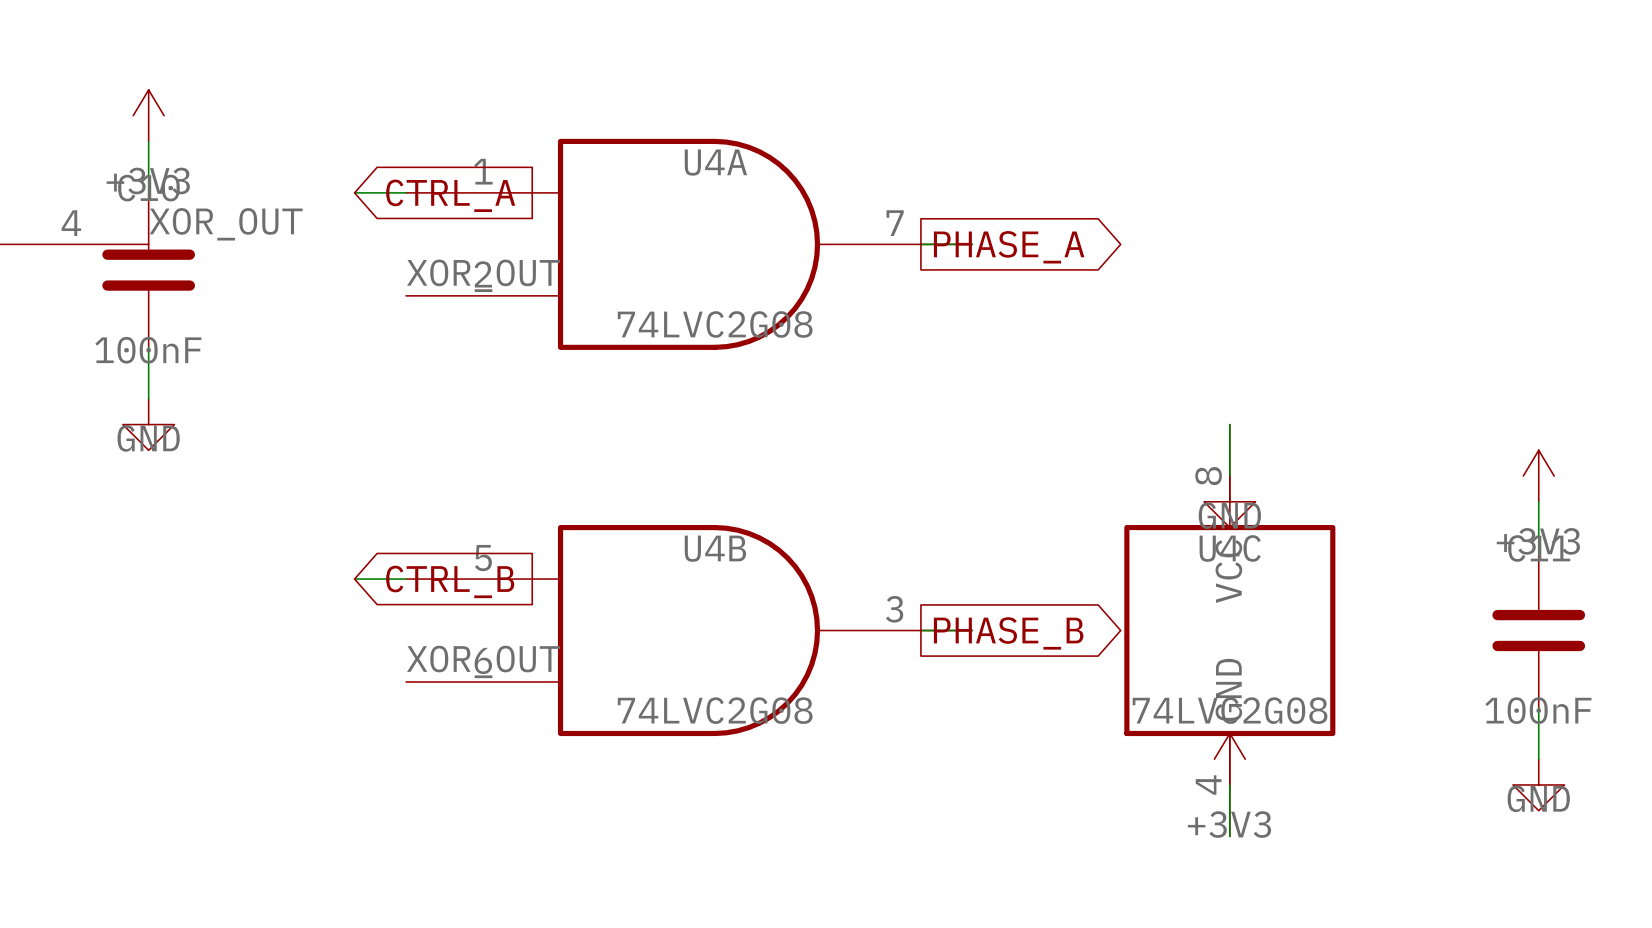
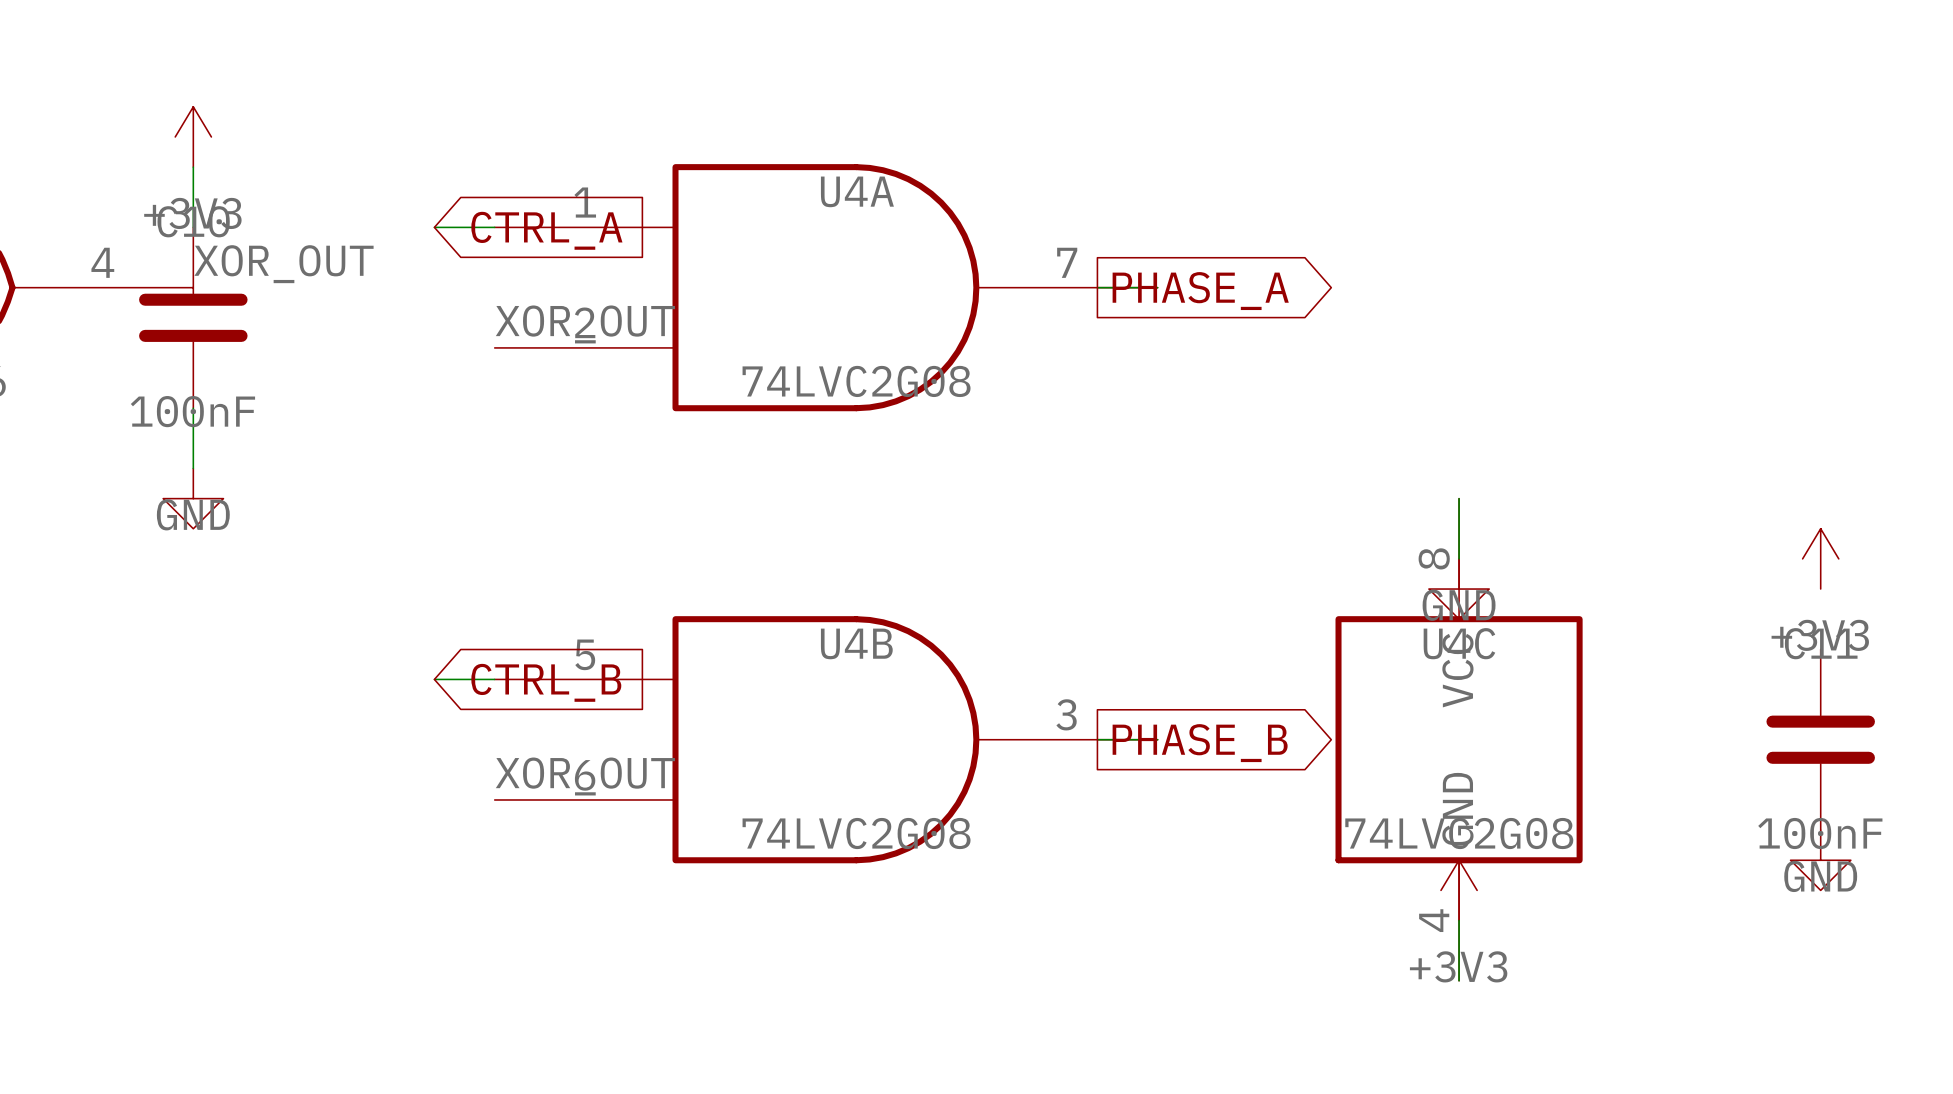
wire: (1538, 501) (1538, 553) -> none
power symbol position: GND (1538, 784) -> GND (1820, 860)

